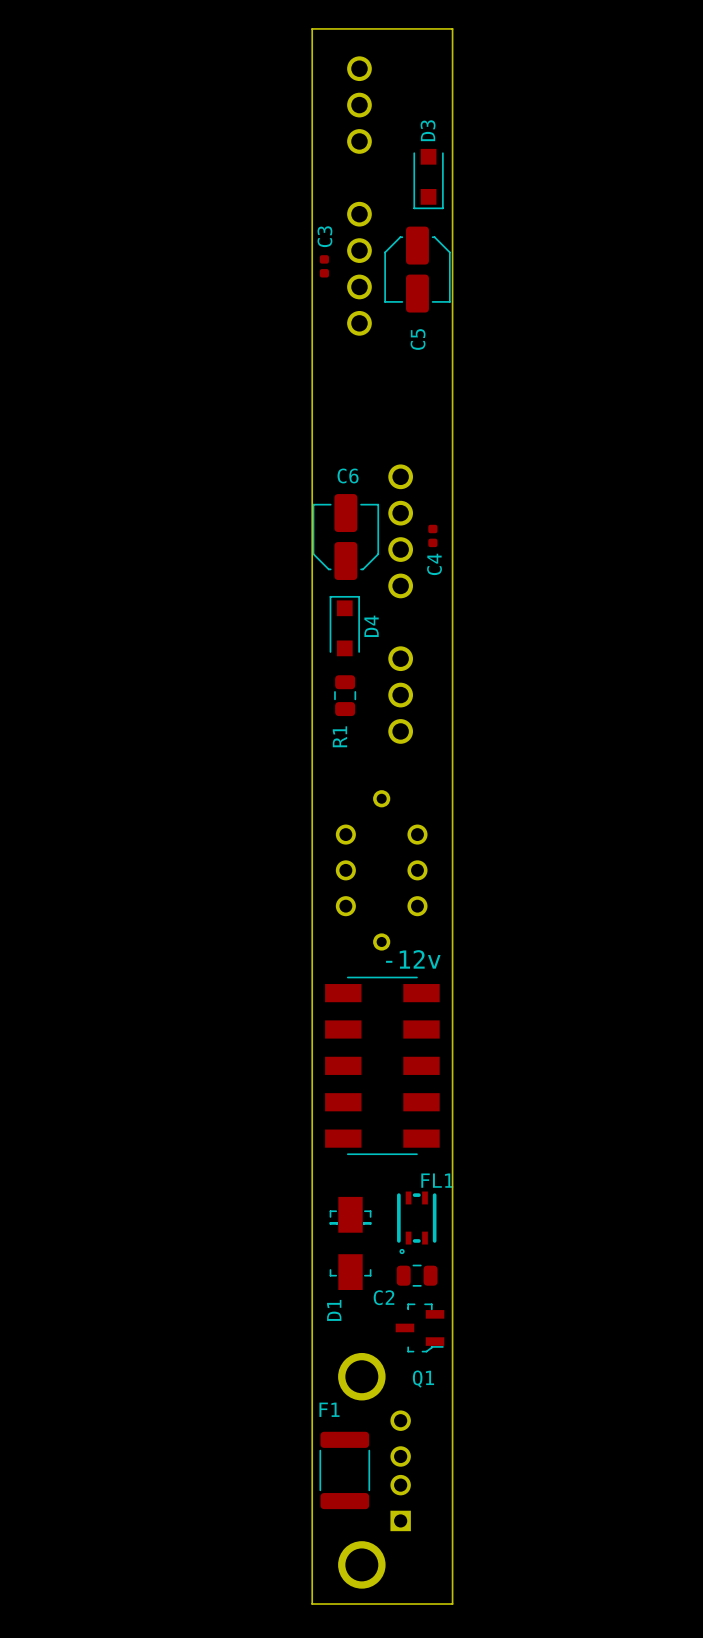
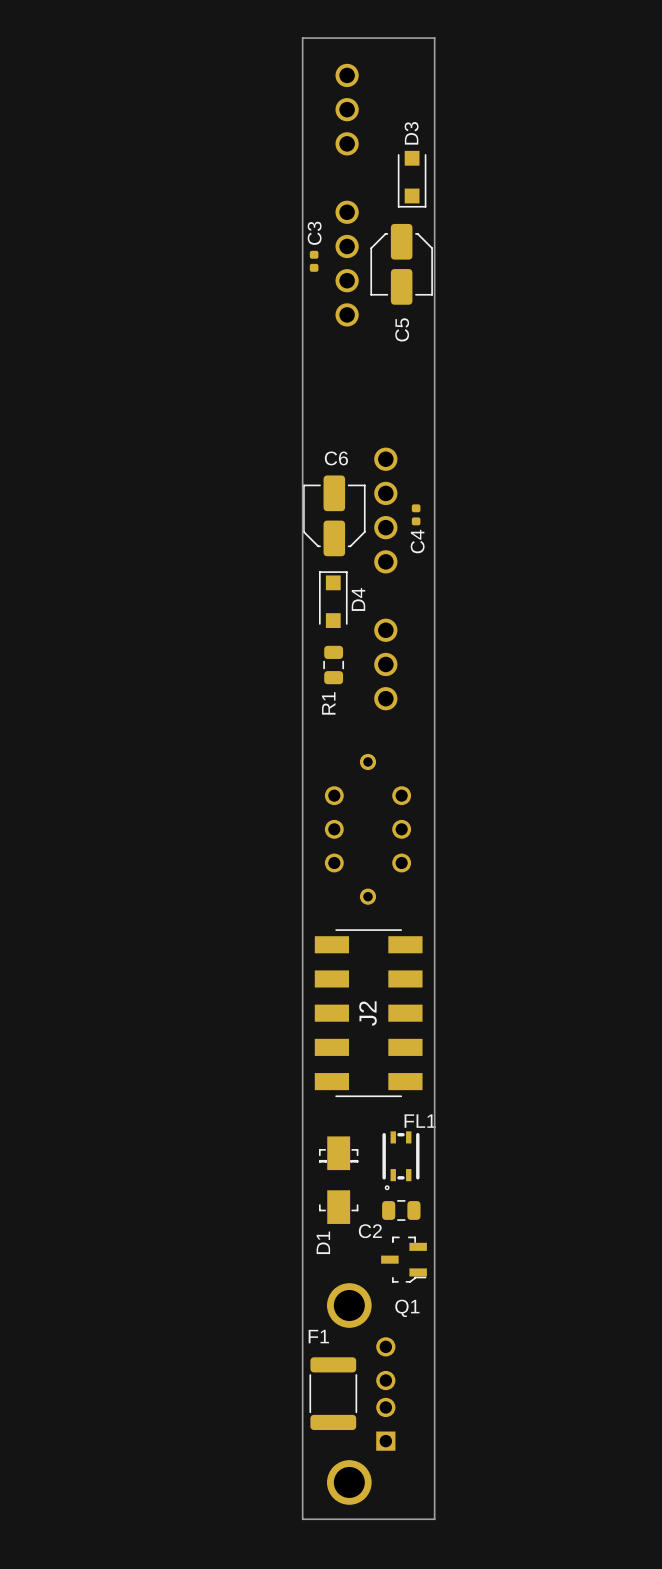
-12v name: -12v (413, 959) -> J2 (368, 1013)

